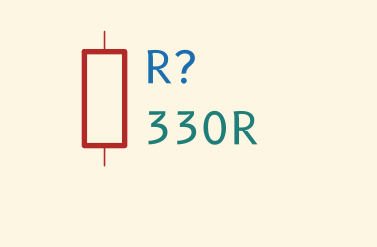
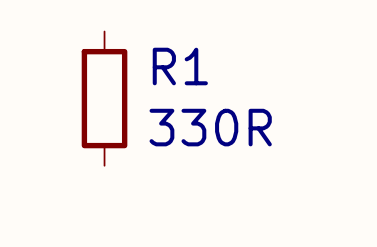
R? name: R? (171, 66) -> R1 (180, 66)

